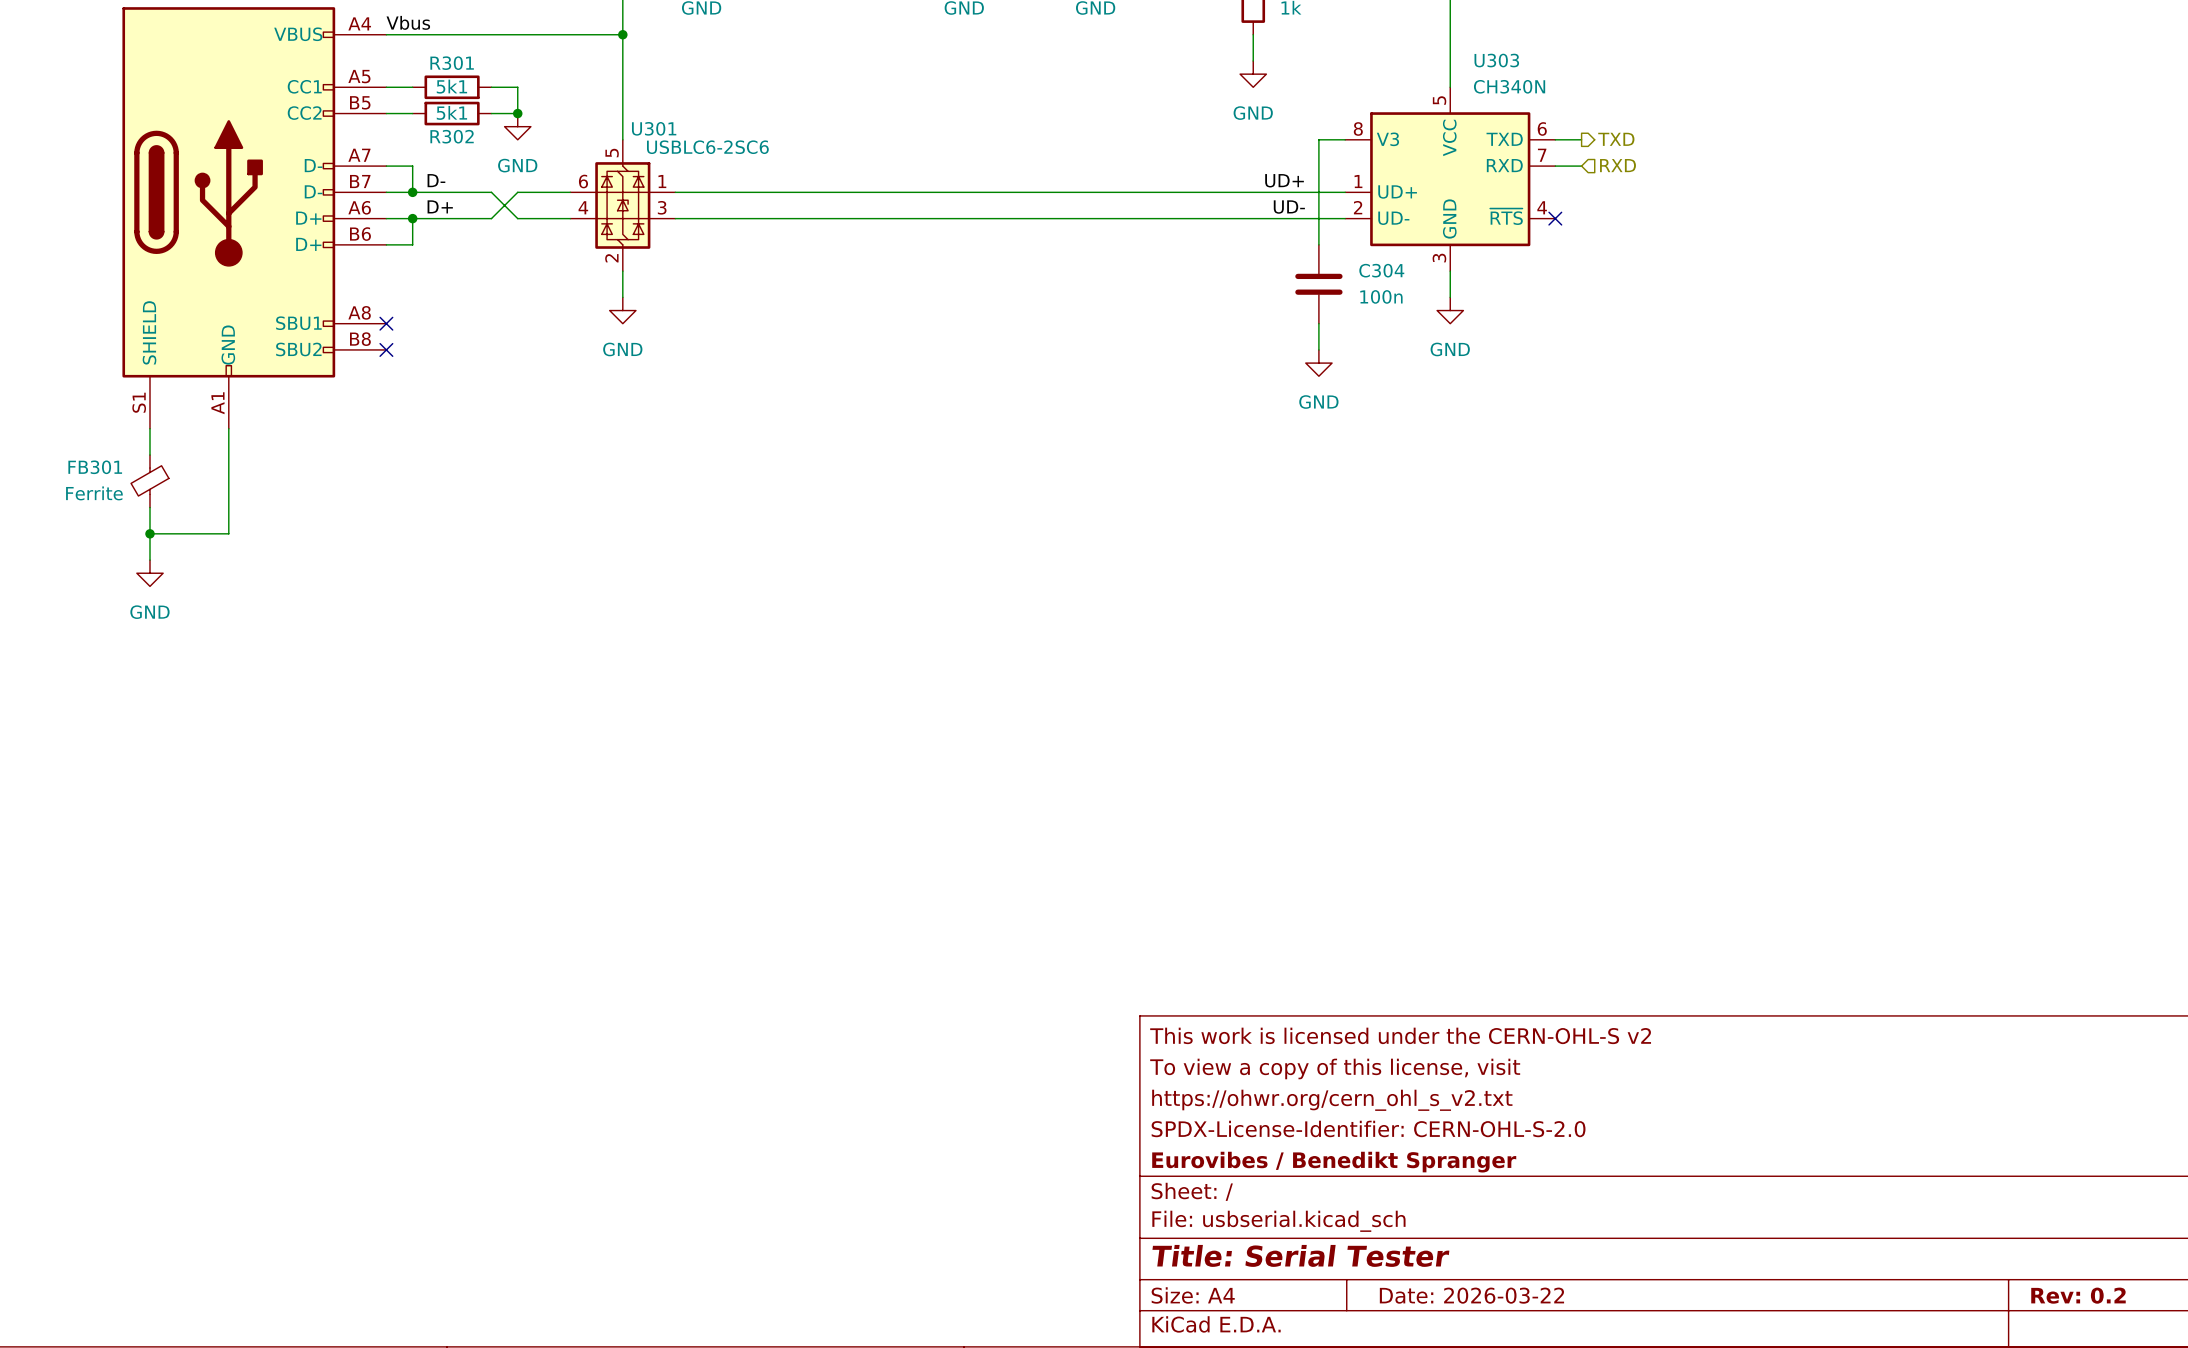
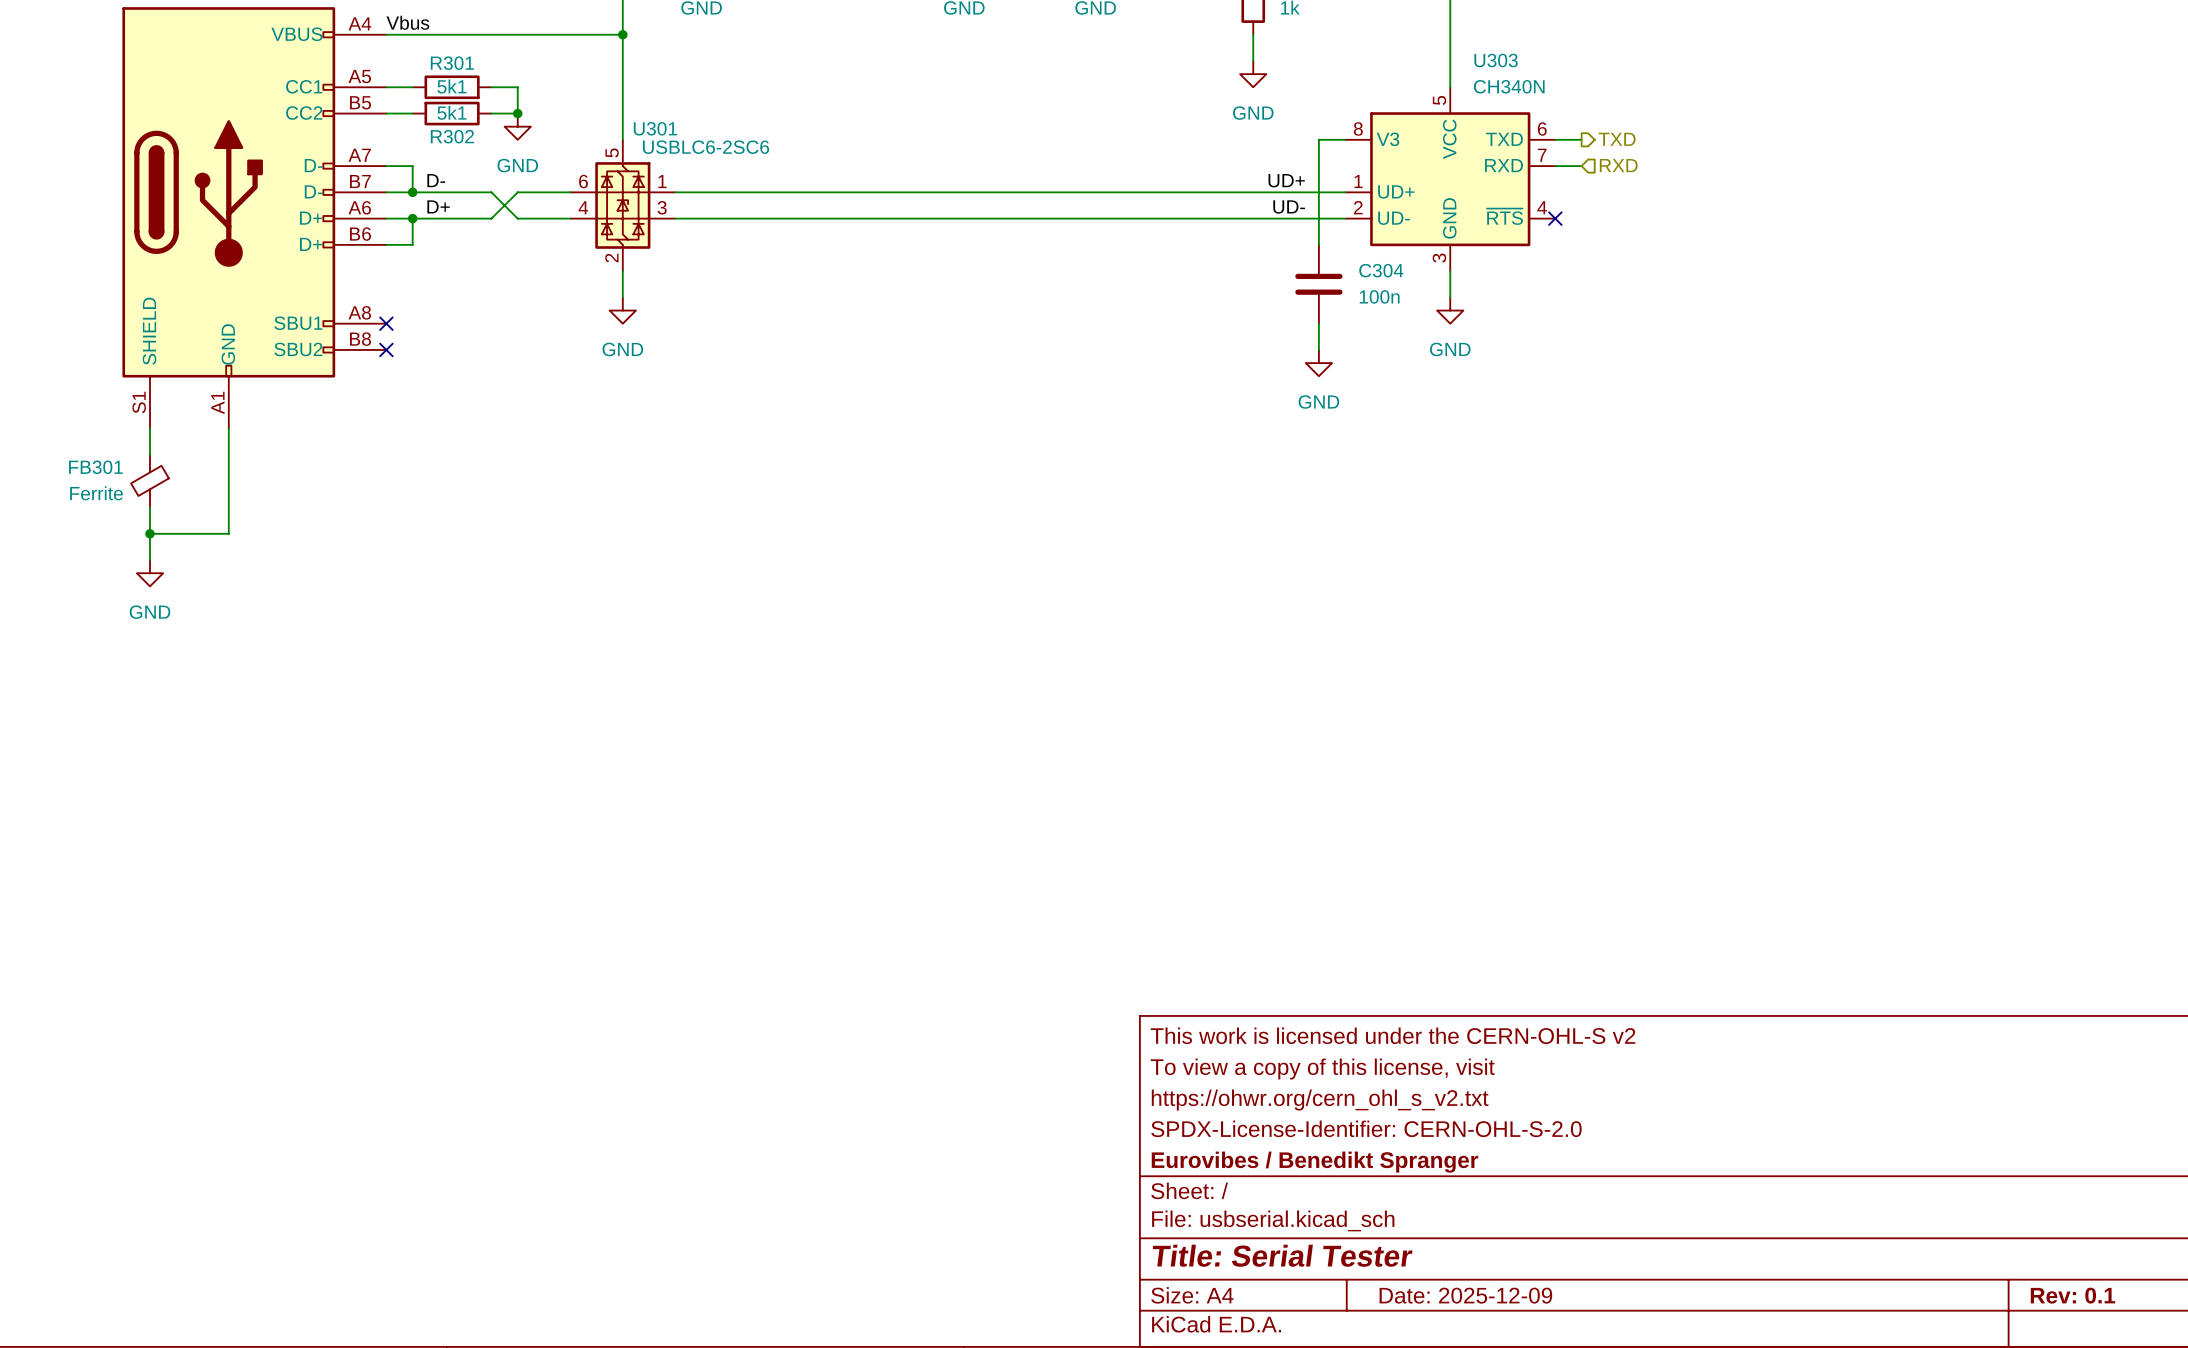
title block: Date: 2026-03-22 (1471, 1295) -> Date: 2025-12-09 (1465, 1295)
title block: Rev: 0.2 (2078, 1295) -> Rev: 0.1 (2072, 1295)

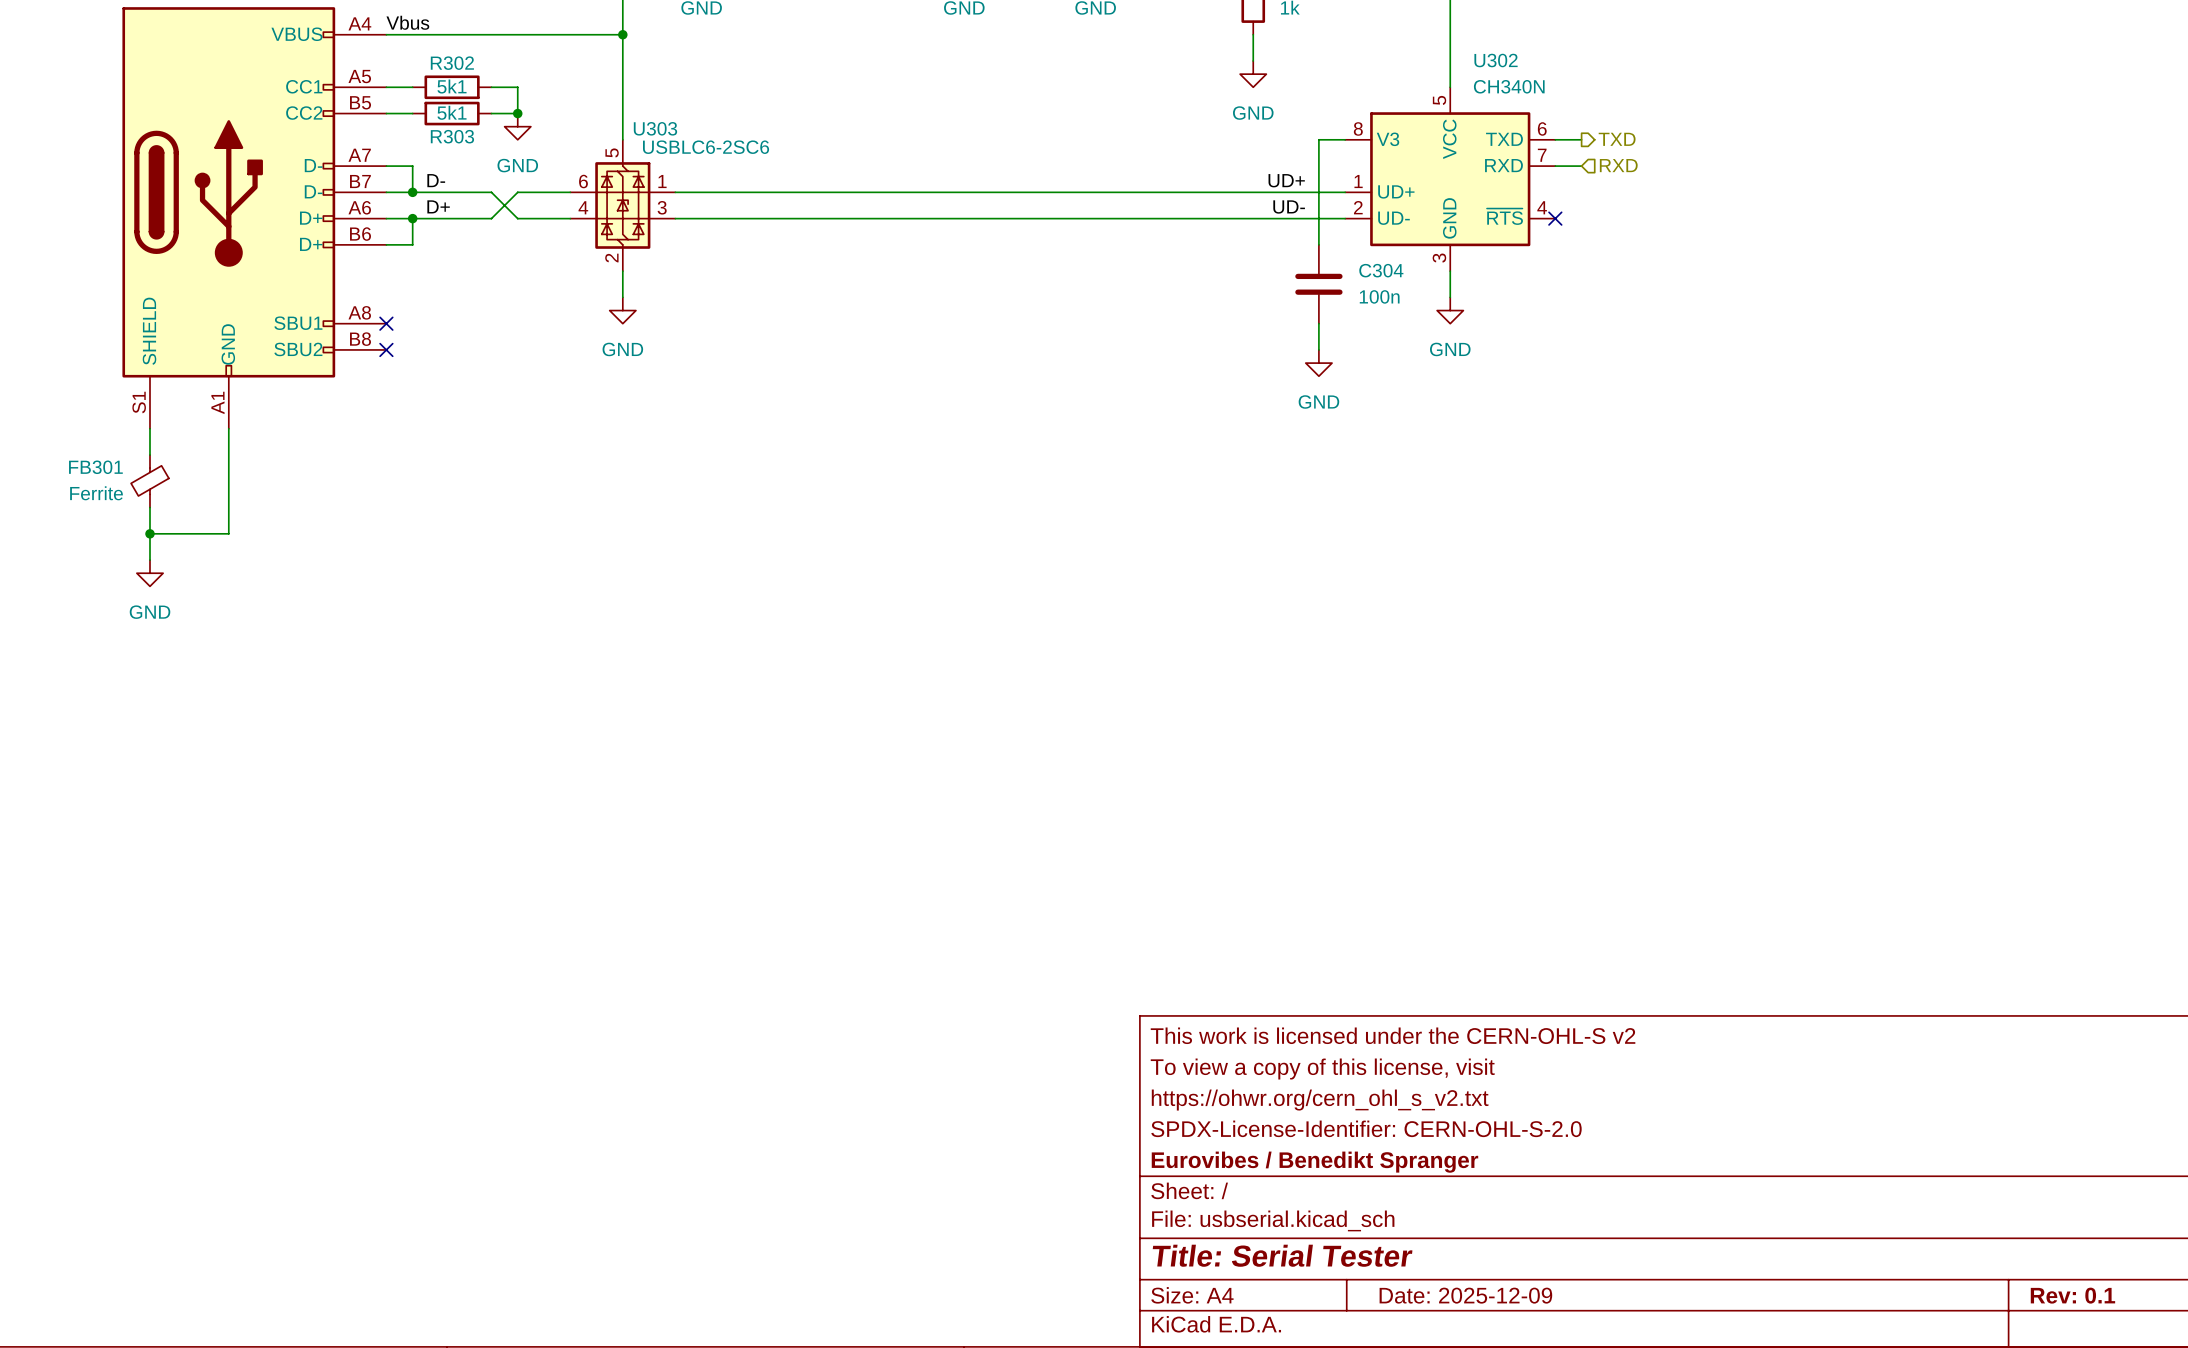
U303 name: U303 (1496, 60) -> U302 (1496, 60)
R301 name: R301 (452, 63) -> R302 (452, 63)
U301 name: U301 (655, 128) -> U303 (655, 128)
R302 name: R302 (452, 136) -> R303 (452, 136)

